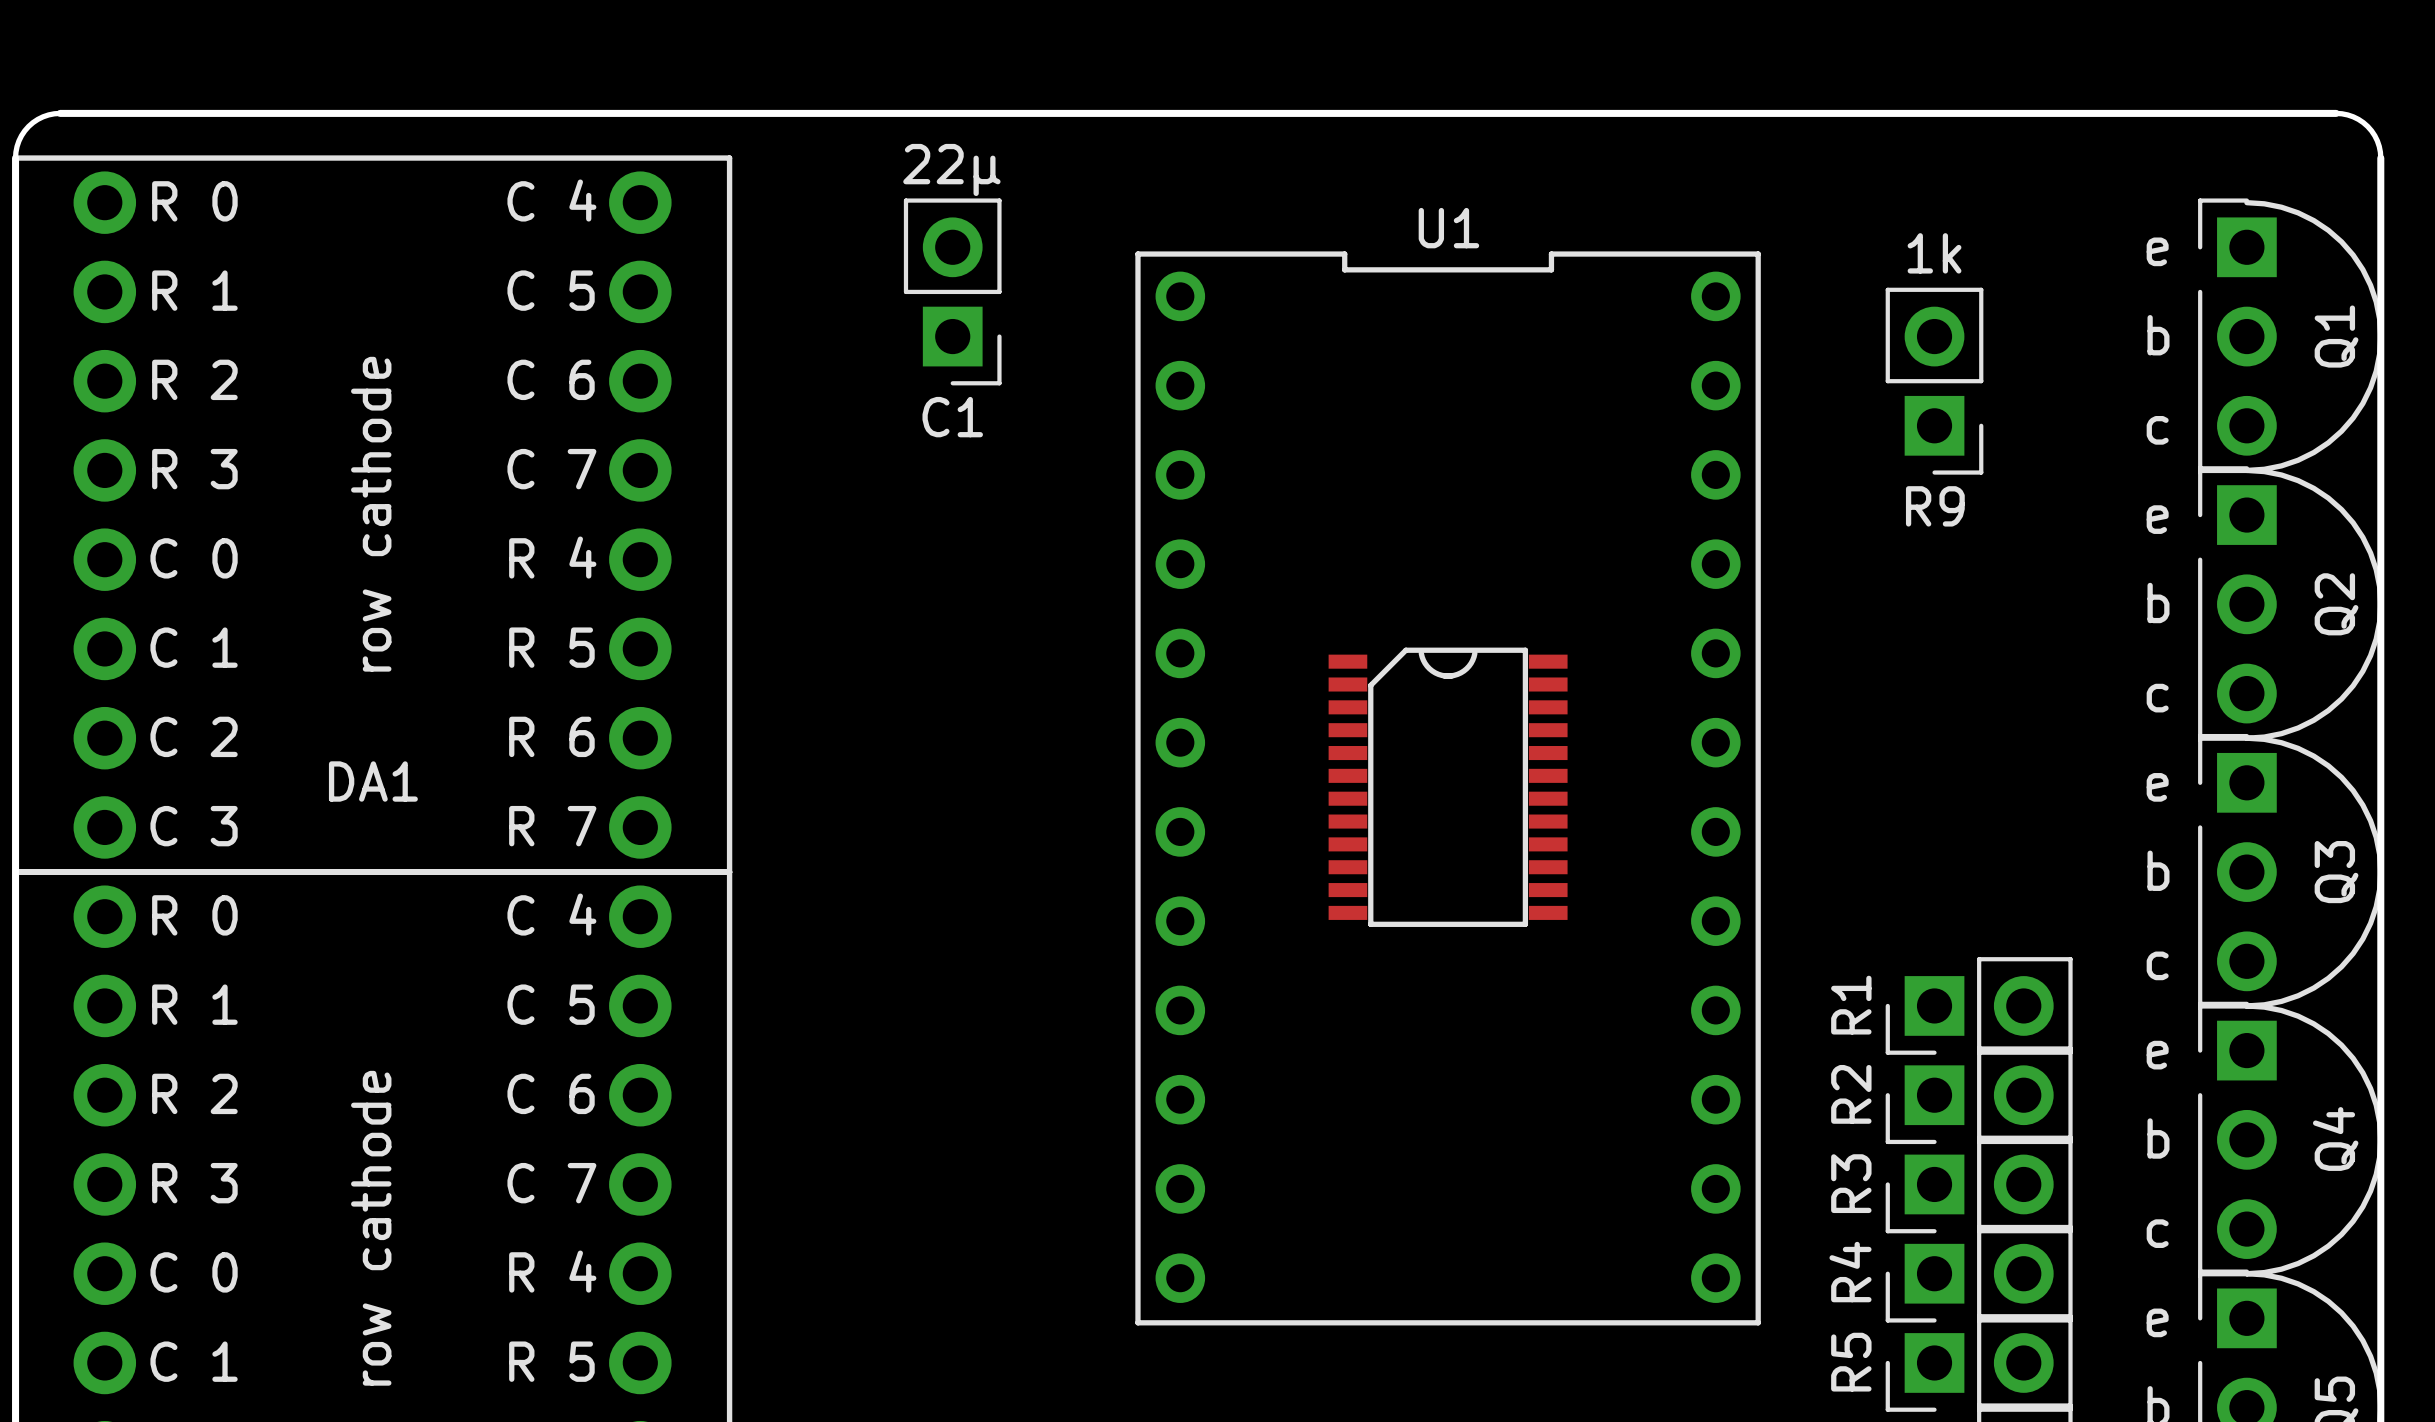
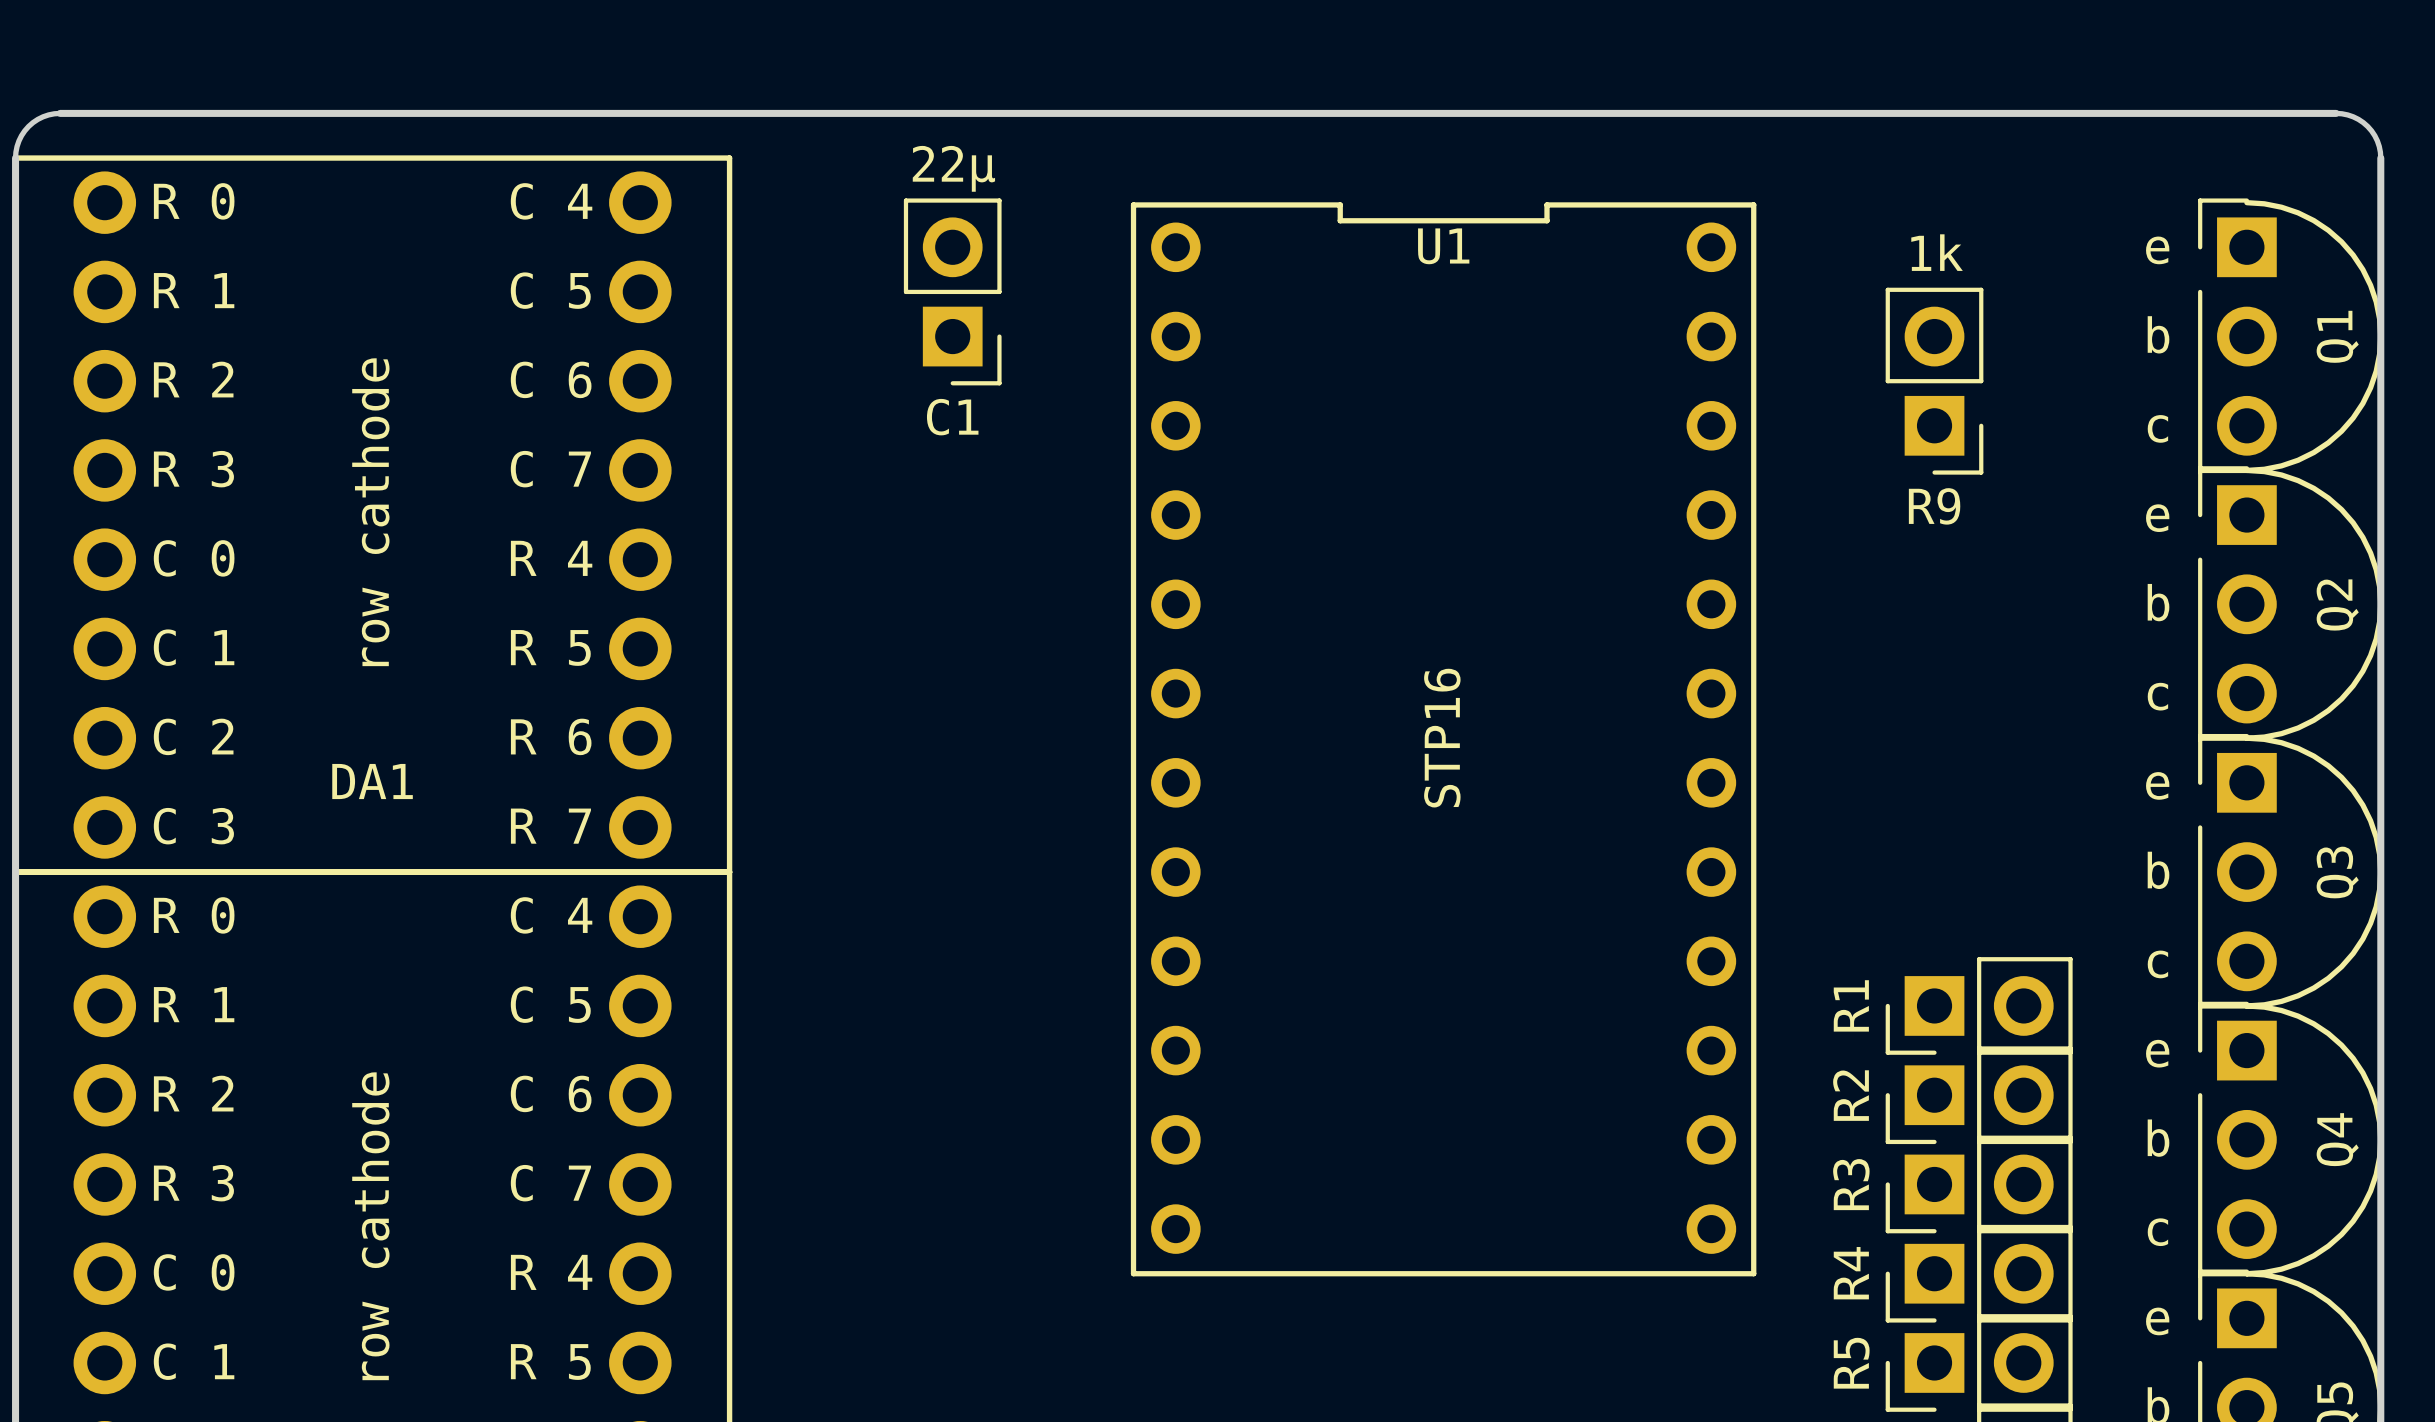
U1 footprint: [1135, 251, 1761, 1326] -> [1130, 202, 1757, 1277]
U1 value: none -> STP16 (1442, 738)

